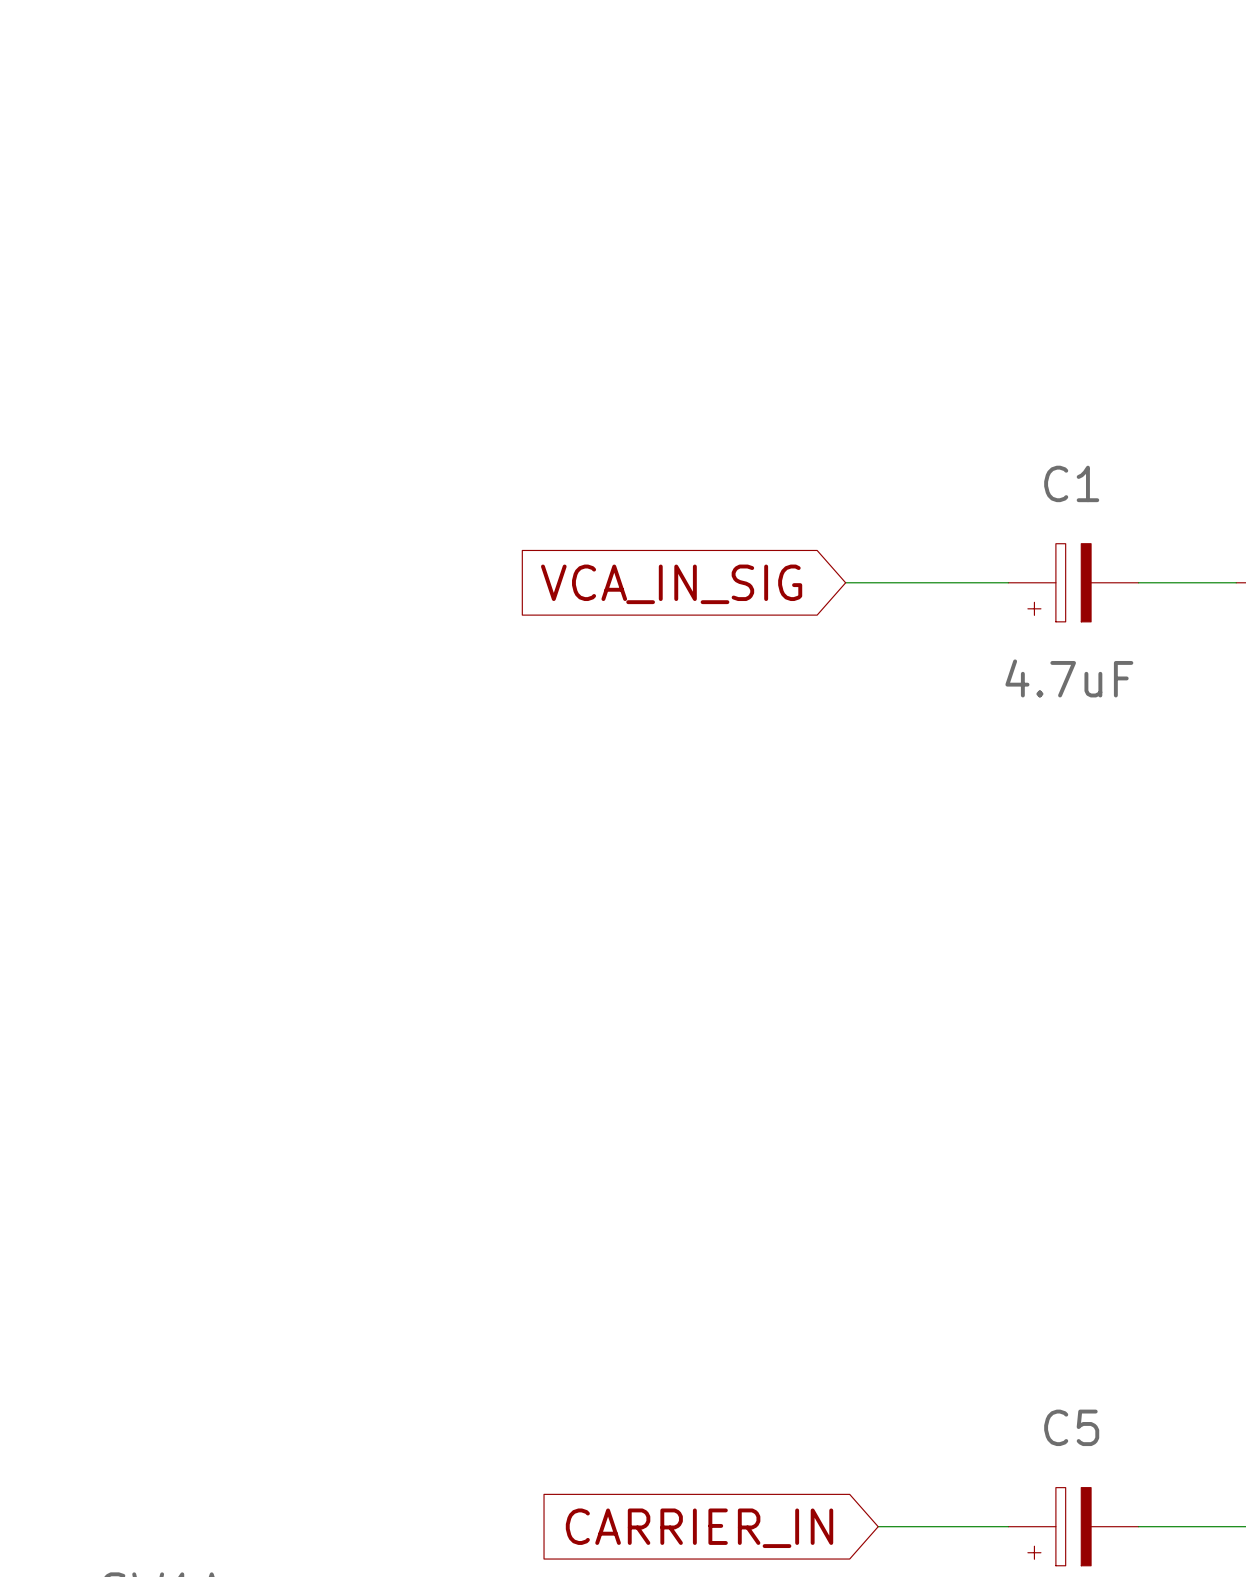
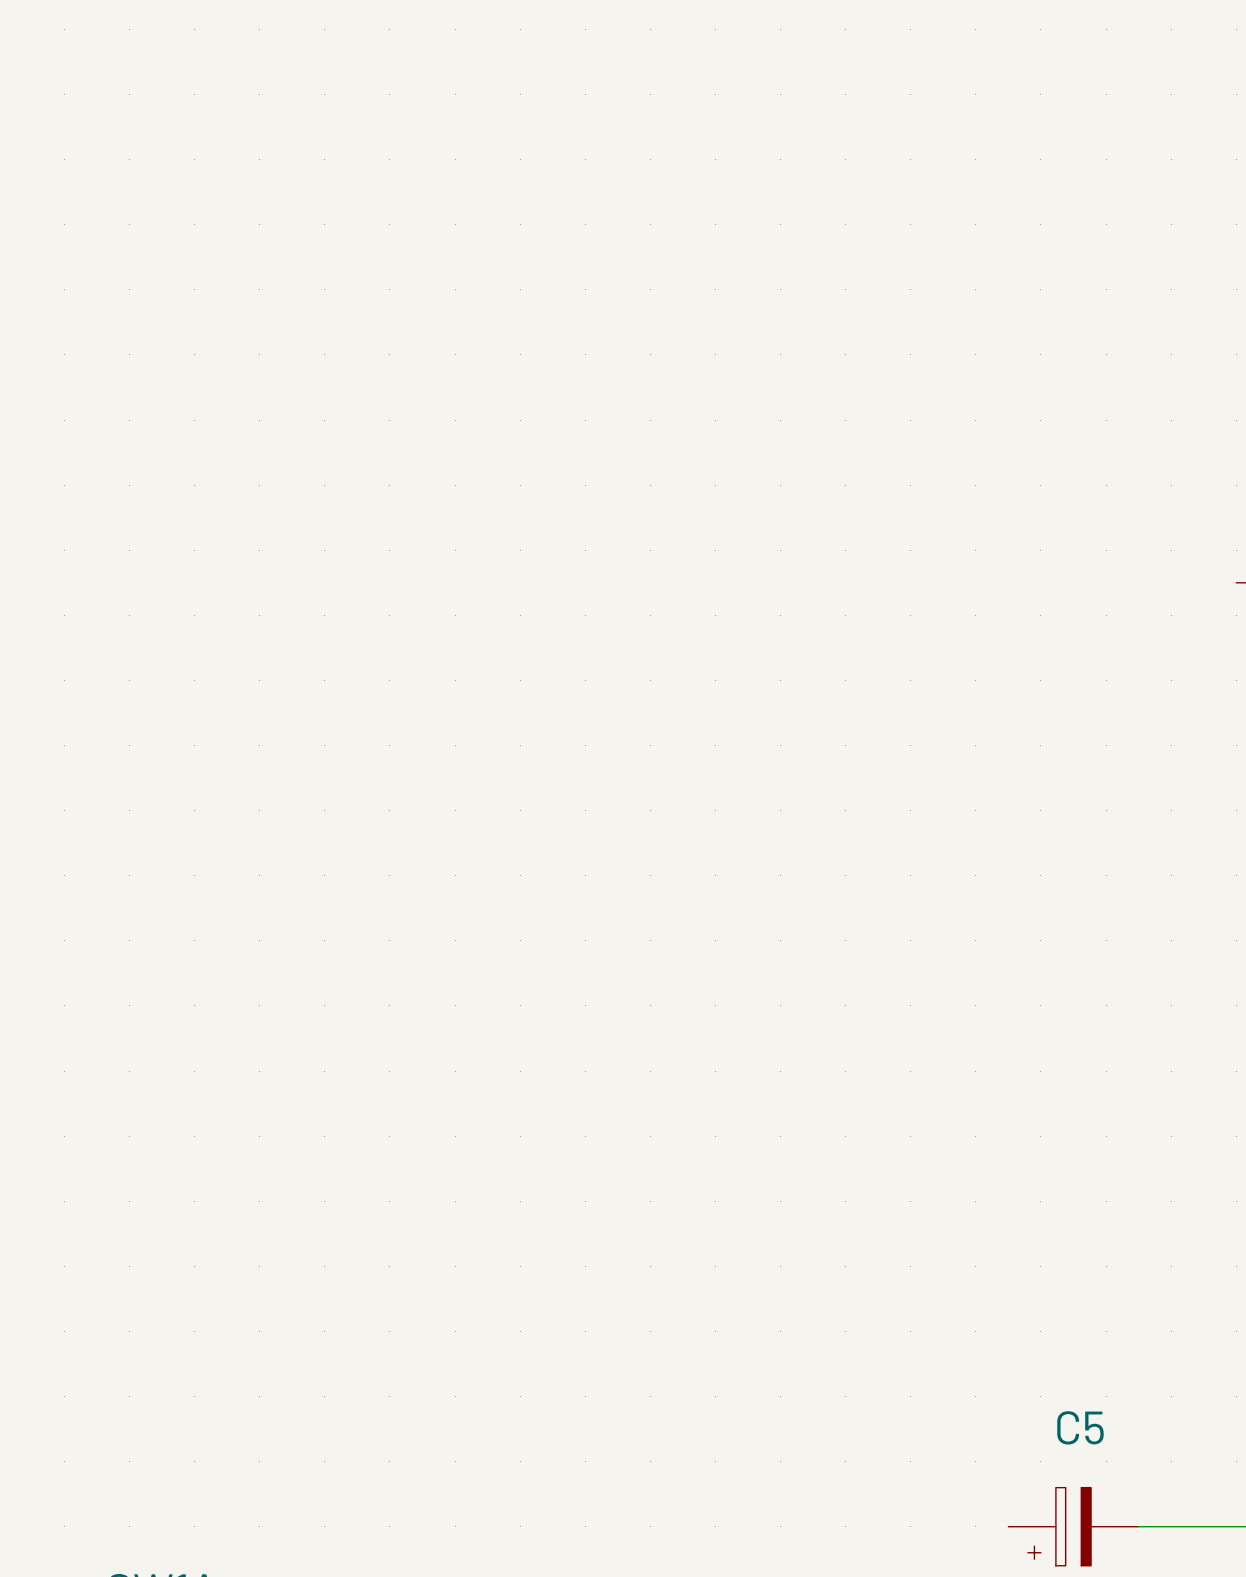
wire: (845, 582) (1008, 582) -> none
C1: 4.7uF (1073, 582) -> none
wire: (1138, 582) (1236, 582) -> none
global label: VCA_IN_SIG (671, 584) -> none
wire: (878, 1526) (1008, 1526) -> none
global label: CARRIER_IN (699, 1528) -> none

